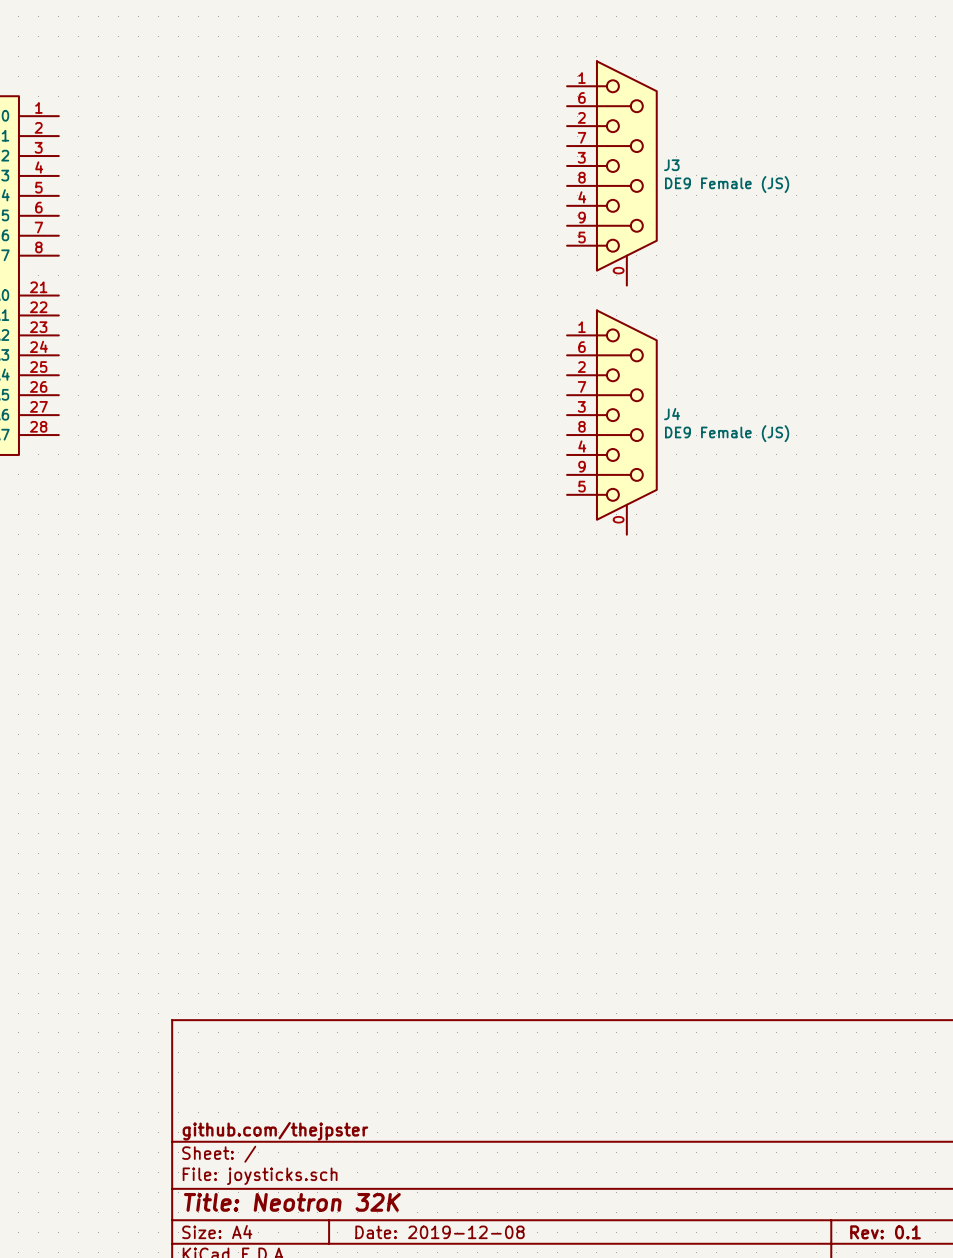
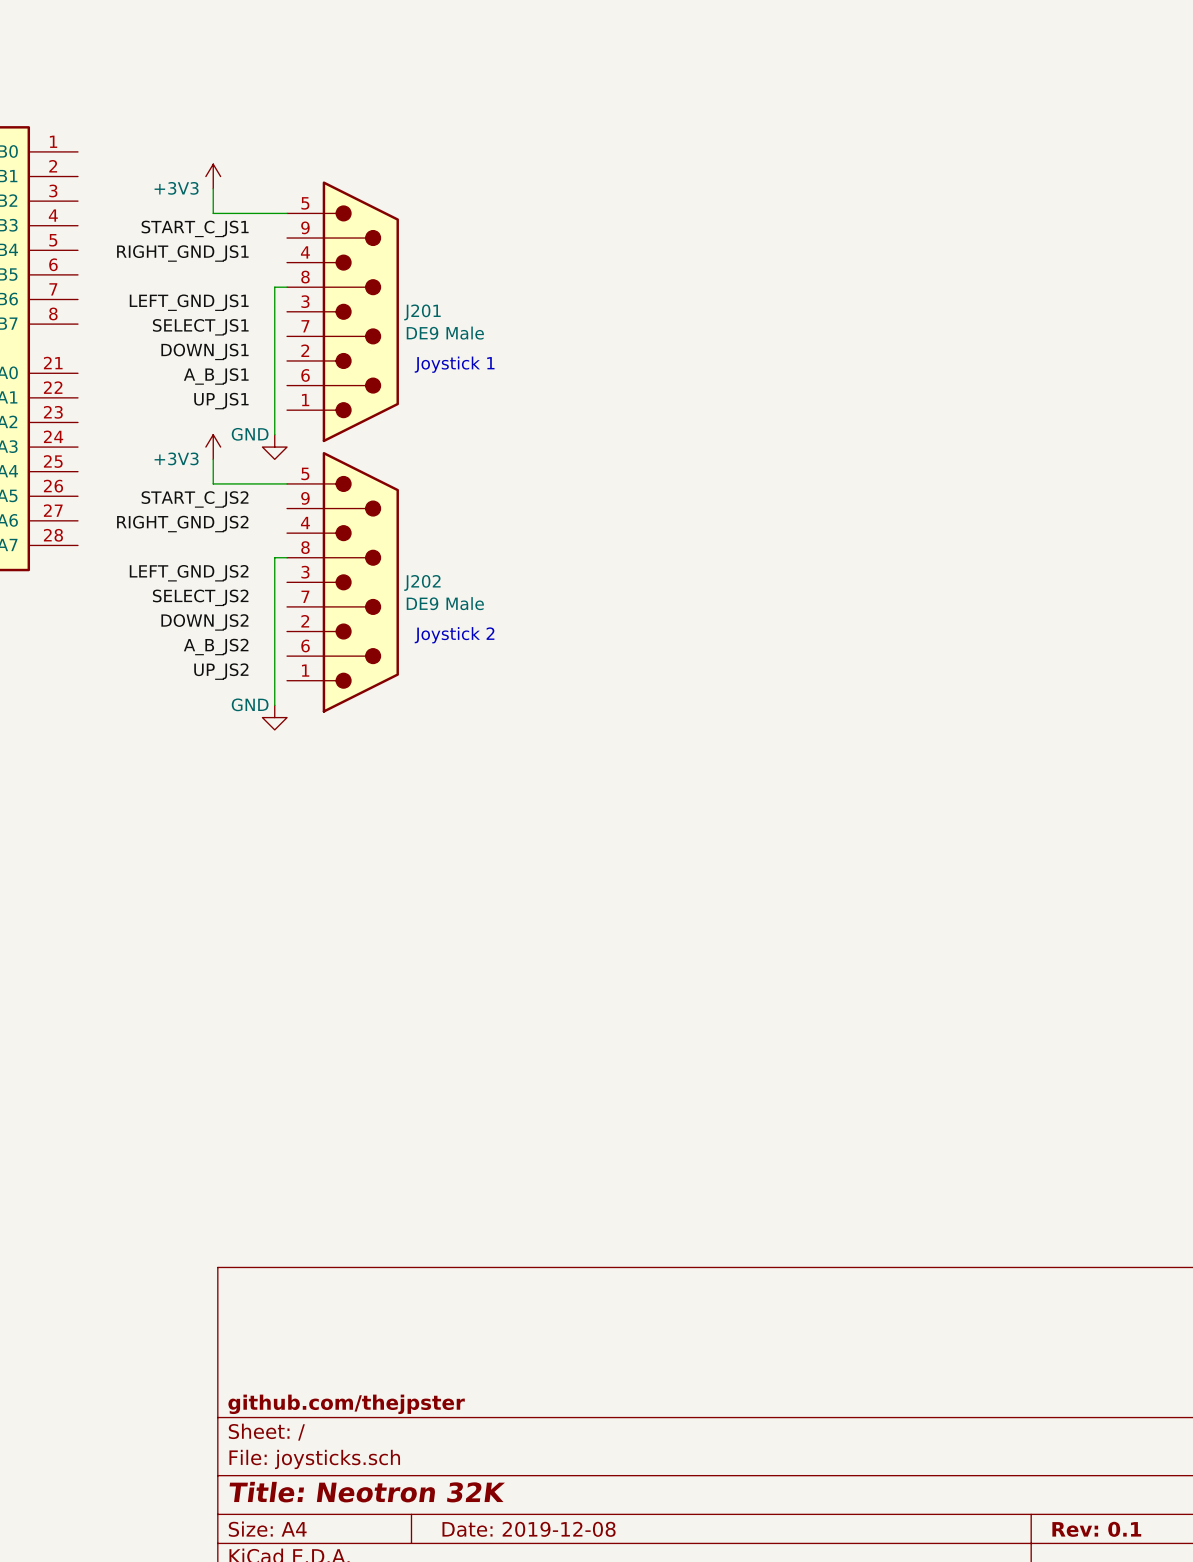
power symbol: none -> +3V3 (213, 176)
wire: none -> (213, 188) (213, 213) (287, 213)
J3: DE9 Female (JS) (612, 172) -> none
label: none -> START_C_JS1 (195, 228)
label: none -> RIGHT_GND_JS1 (182, 253)
wire: none -> (287, 287) (274, 287) (274, 434)
label: none -> LEFT_GND_JS1 (189, 302)
J201: none -> DE9 Male (342, 311)
label: none -> SELECT_JS1 (200, 327)
label: none -> DOWN_JS1 (204, 351)
text: none -> Joystick 1 (454, 364)
label: none -> A_B_JS1 (216, 376)
label: none -> UP_JS1 (221, 401)
power symbol: none -> +3V3 (213, 447)
power symbol: none -> GND (274, 447)
wire: none -> (213, 459) (213, 483) (287, 483)
label: none -> START_C_JS2 (195, 499)
label: none -> RIGHT_GND_JS2 (182, 524)
J4: DE9 Female (JS) (612, 422) -> none
wire: none -> (287, 557) (274, 557) (274, 705)
label: none -> LEFT_GND_JS2 (189, 573)
J202: none -> DE9 Male (342, 582)
label: none -> SELECT_JS2 (200, 597)
label: none -> DOWN_JS2 (204, 622)
text: none -> Joystick 2 (454, 635)
label: none -> A_B_JS2 (216, 647)
label: none -> UP_JS2 (221, 671)
power symbol: none -> GND (274, 717)

